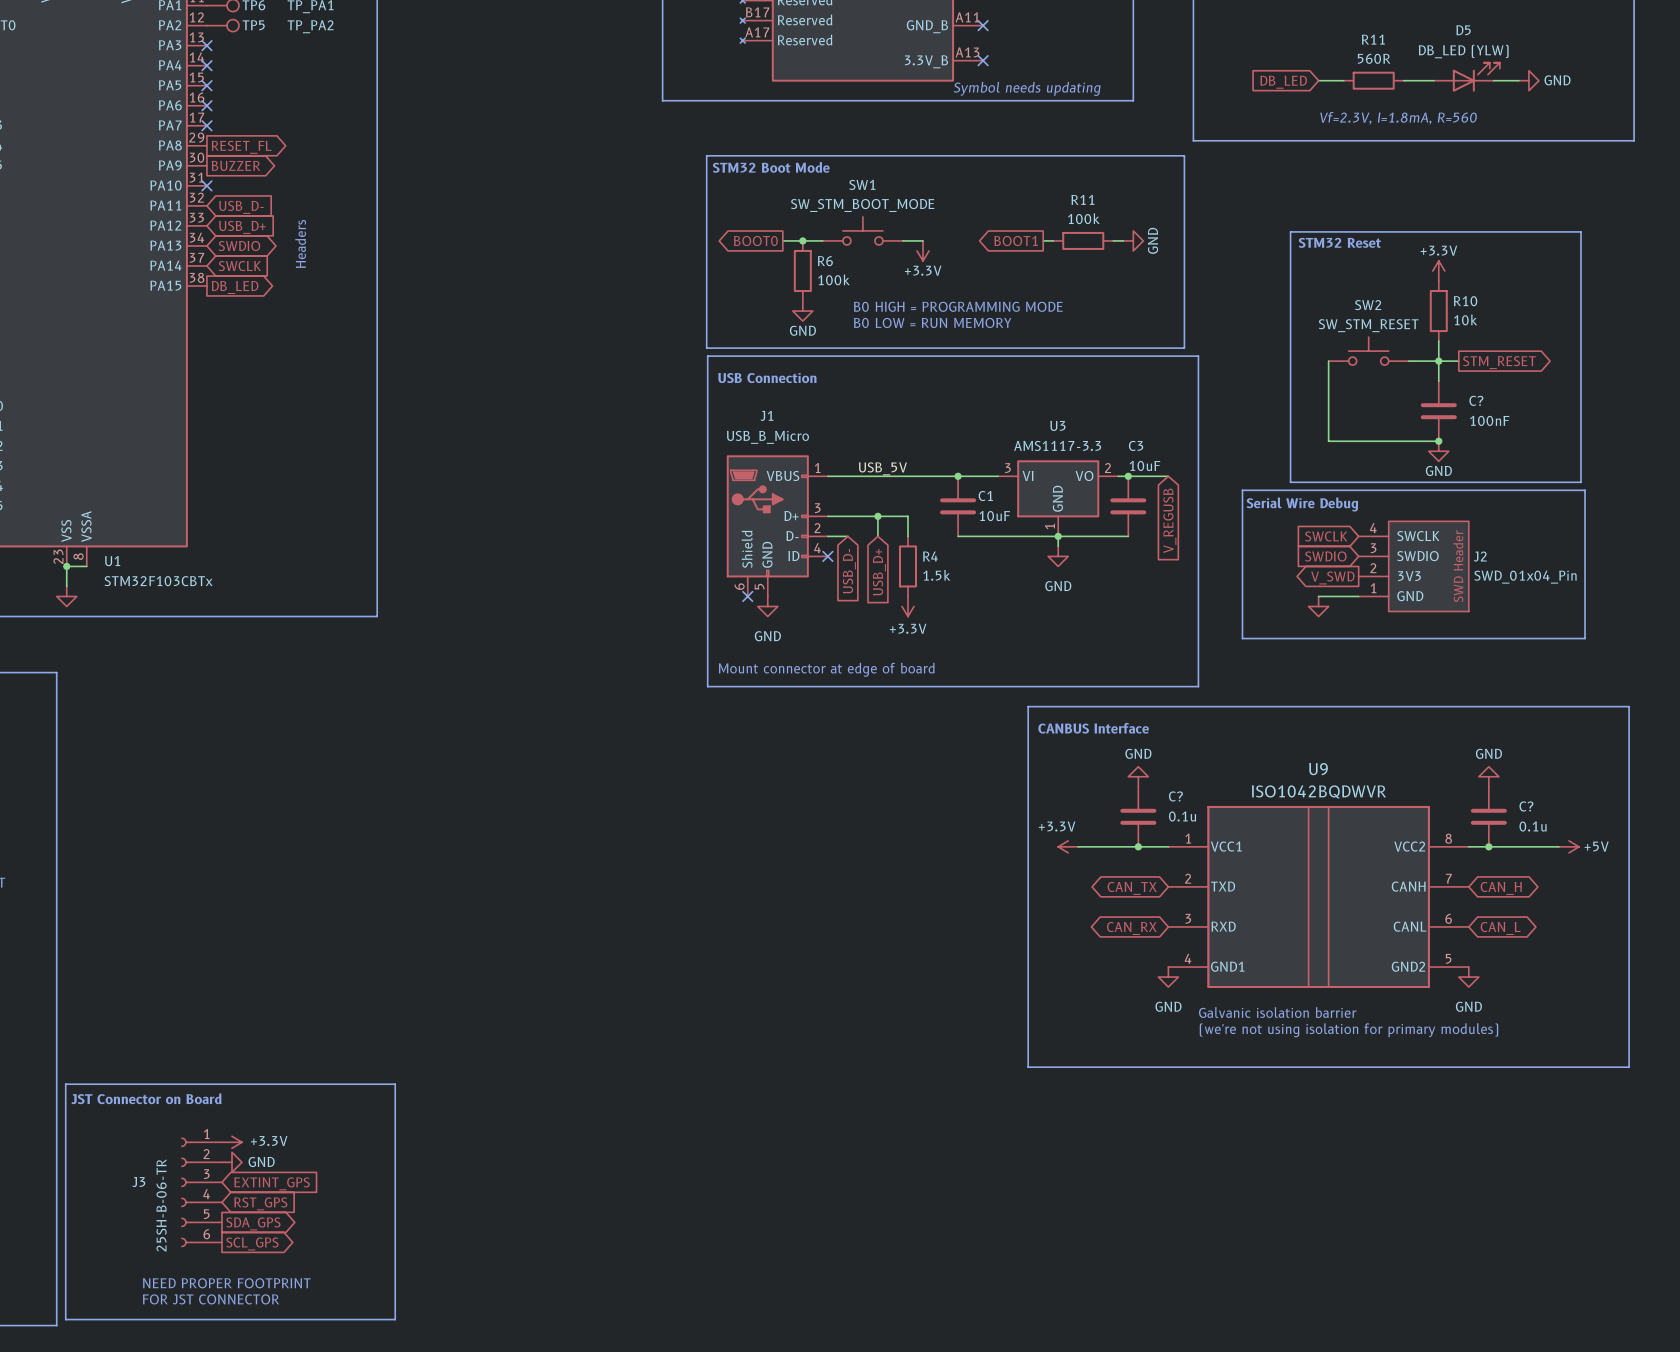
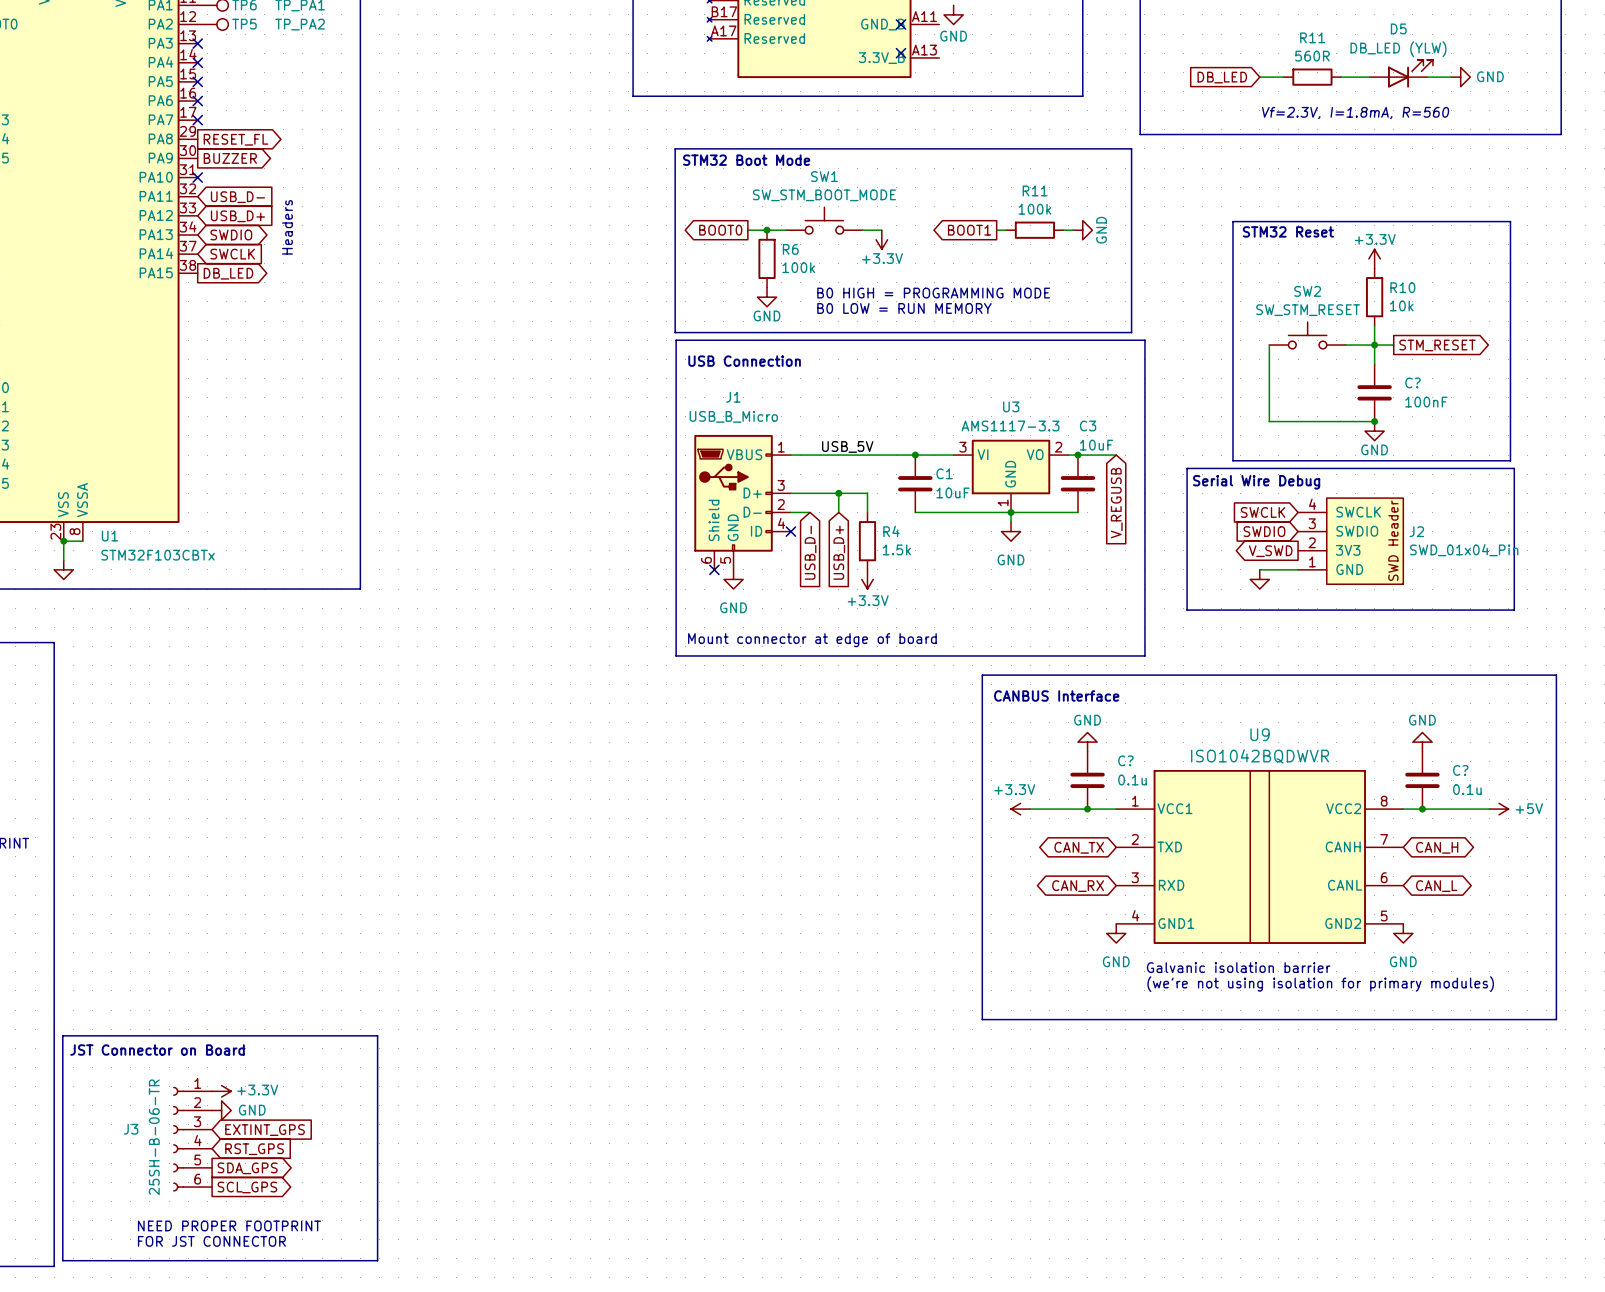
power symbol: none -> GND (953, 14)
no-connect mark: none -> (900, 24)
no-connect mark: (983, 25) -> none
no-connect mark: none -> (900, 53)
no-connect mark: (983, 60) -> none
text: Symbol needs updating (1027, 88) -> none

